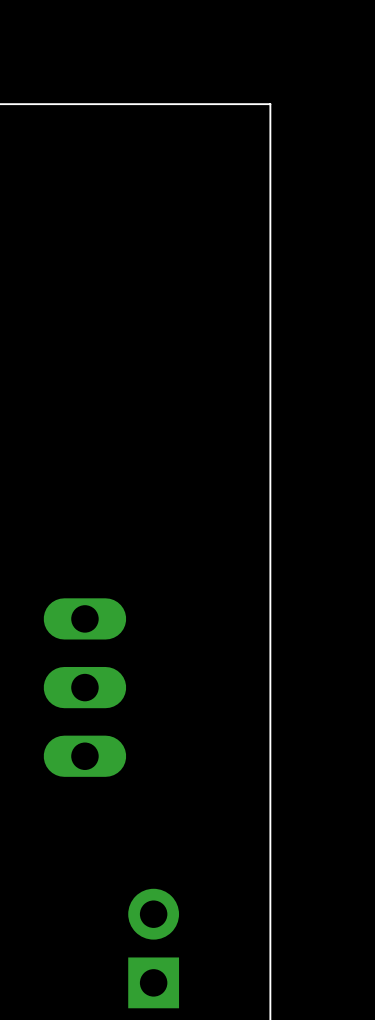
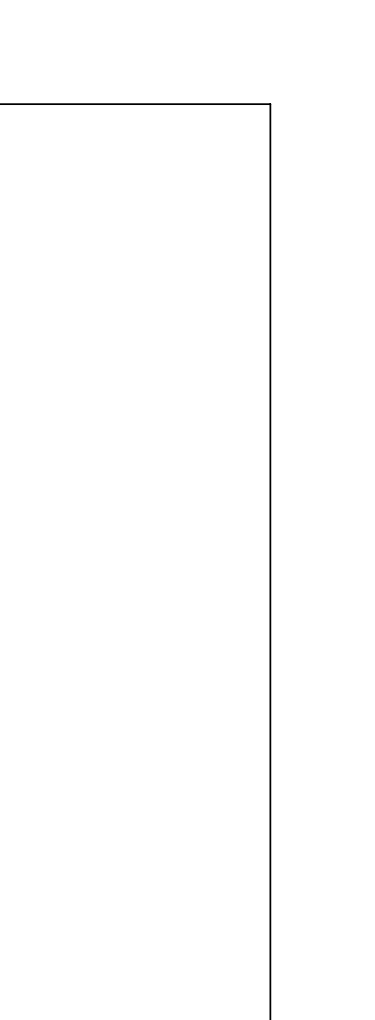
part: (84, 687) -> none
part: (153, 948) -> none

